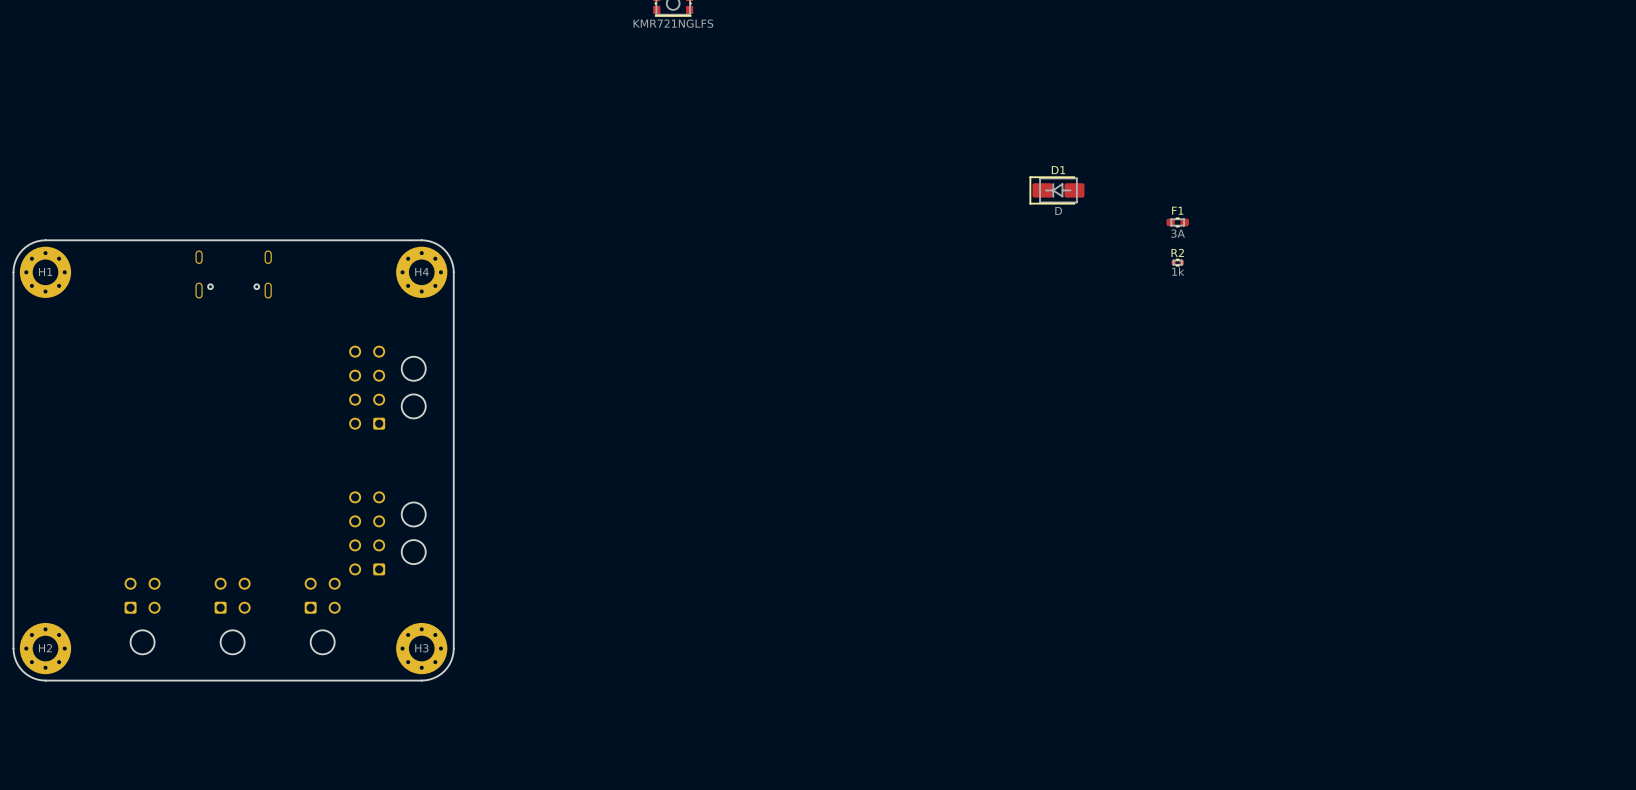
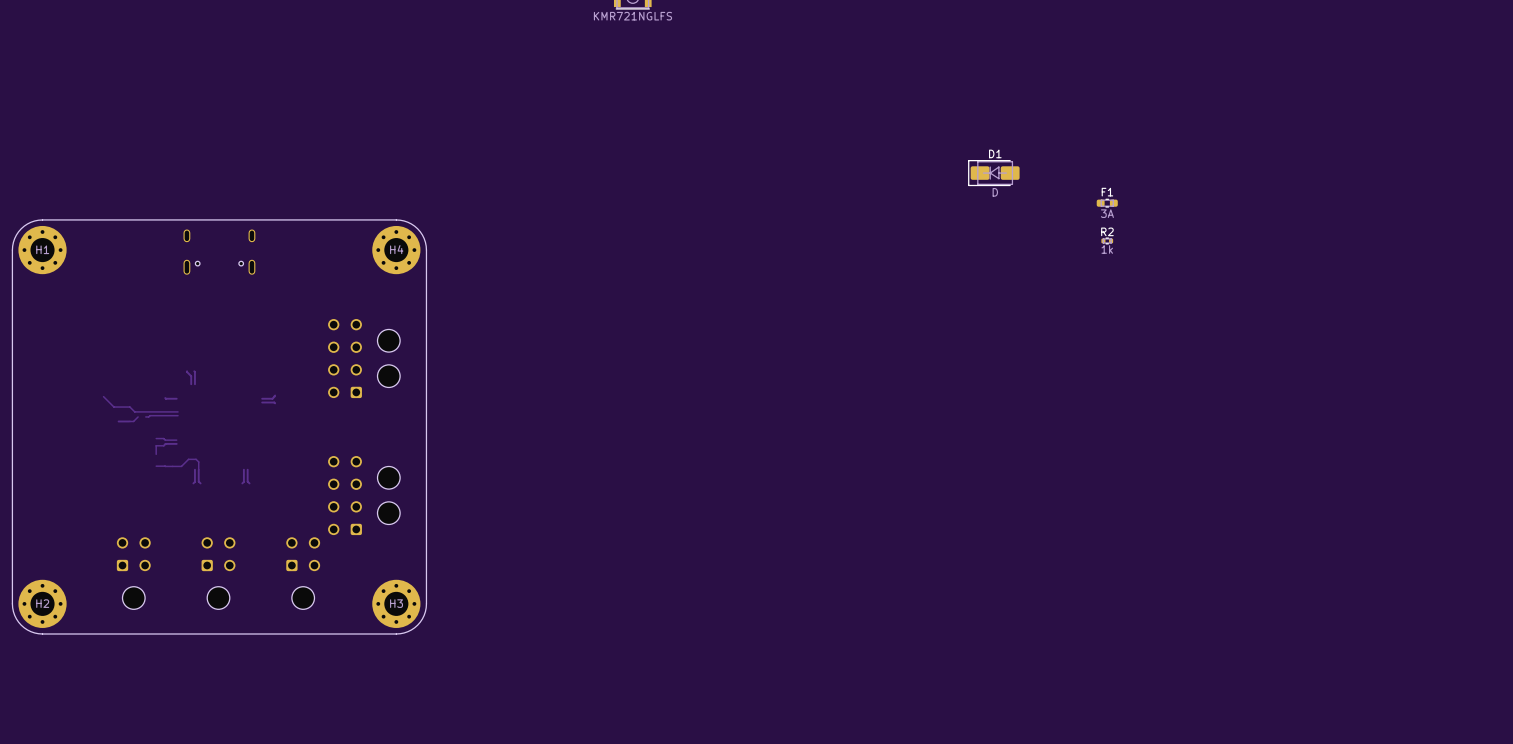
track: none -> (187, 371) (191, 376) (191, 384)
track: none -> (194, 371) (194, 384)
track: none -> (275, 396) (272, 398) (262, 398)
track: none -> (103, 396) (113, 407) (129, 407) (134, 411) (178, 411)
track: none -> (165, 398) (176, 398)
track: none -> (262, 402) (275, 403)
track: none -> (178, 415) (145, 416)
track: none -> (138, 416) (133, 421) (129, 421)
track: none -> (118, 421) (129, 421)
track: none -> (156, 438) (176, 440)
track: none -> (176, 443) (156, 445) (156, 454)
track: none -> (156, 466) (181, 466) (188, 459) (196, 459) (198, 461) (198, 481) (200, 483)
track: none -> (194, 469) (193, 483)
track: none -> (243, 469) (242, 483)
track: none -> (247, 469) (247, 481) (249, 483)

